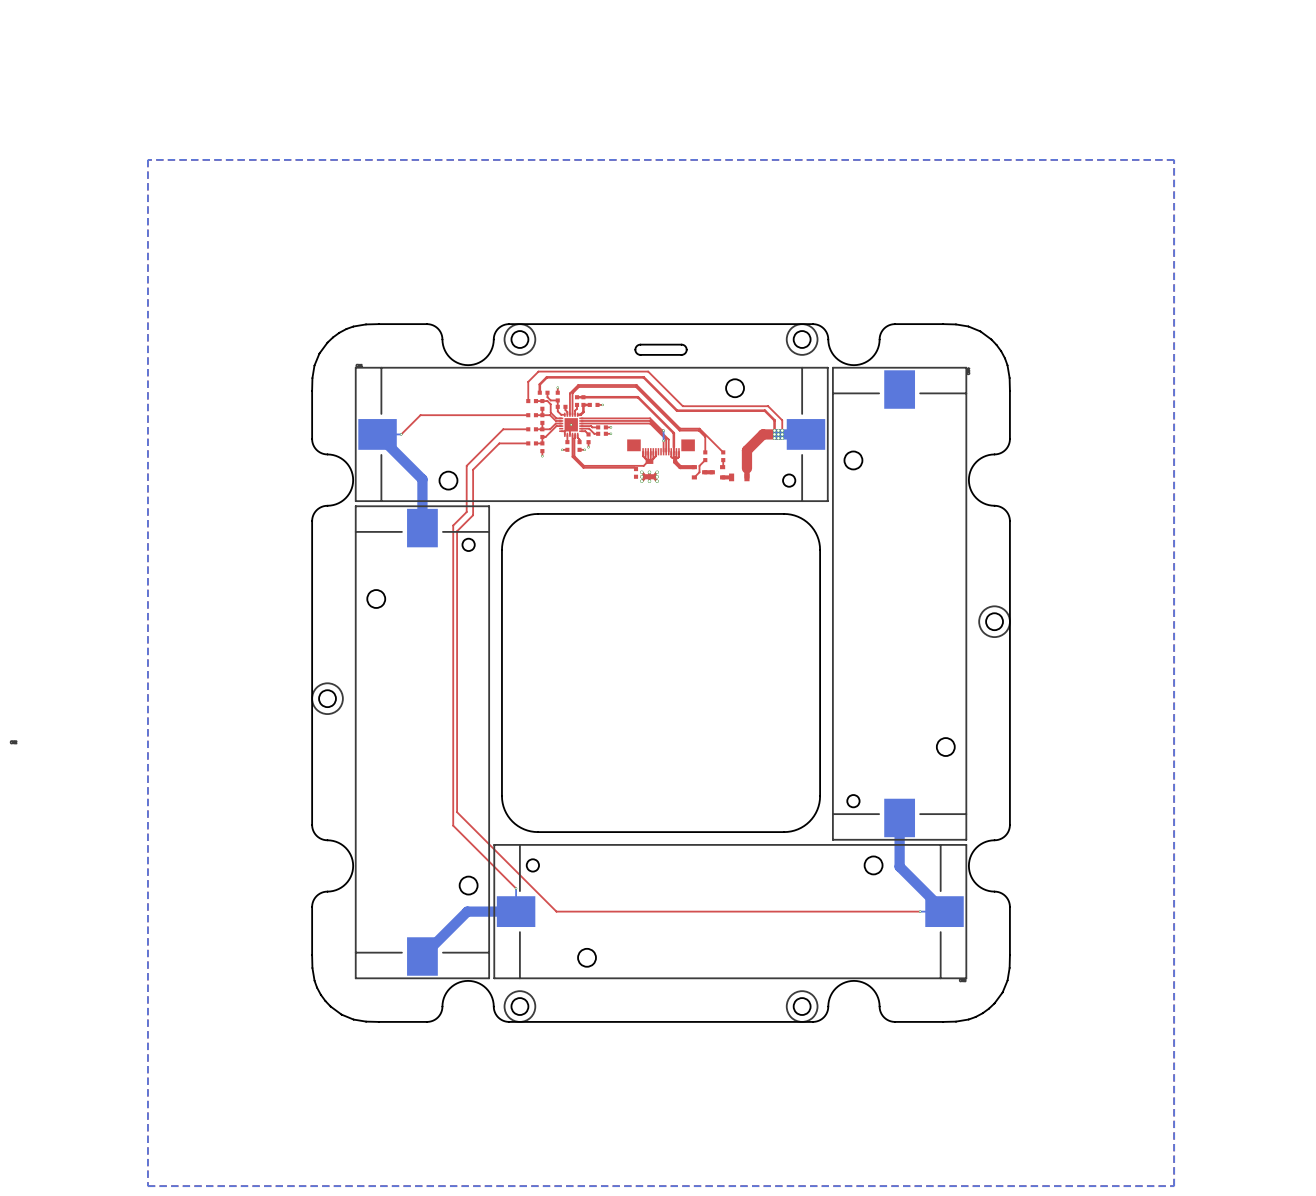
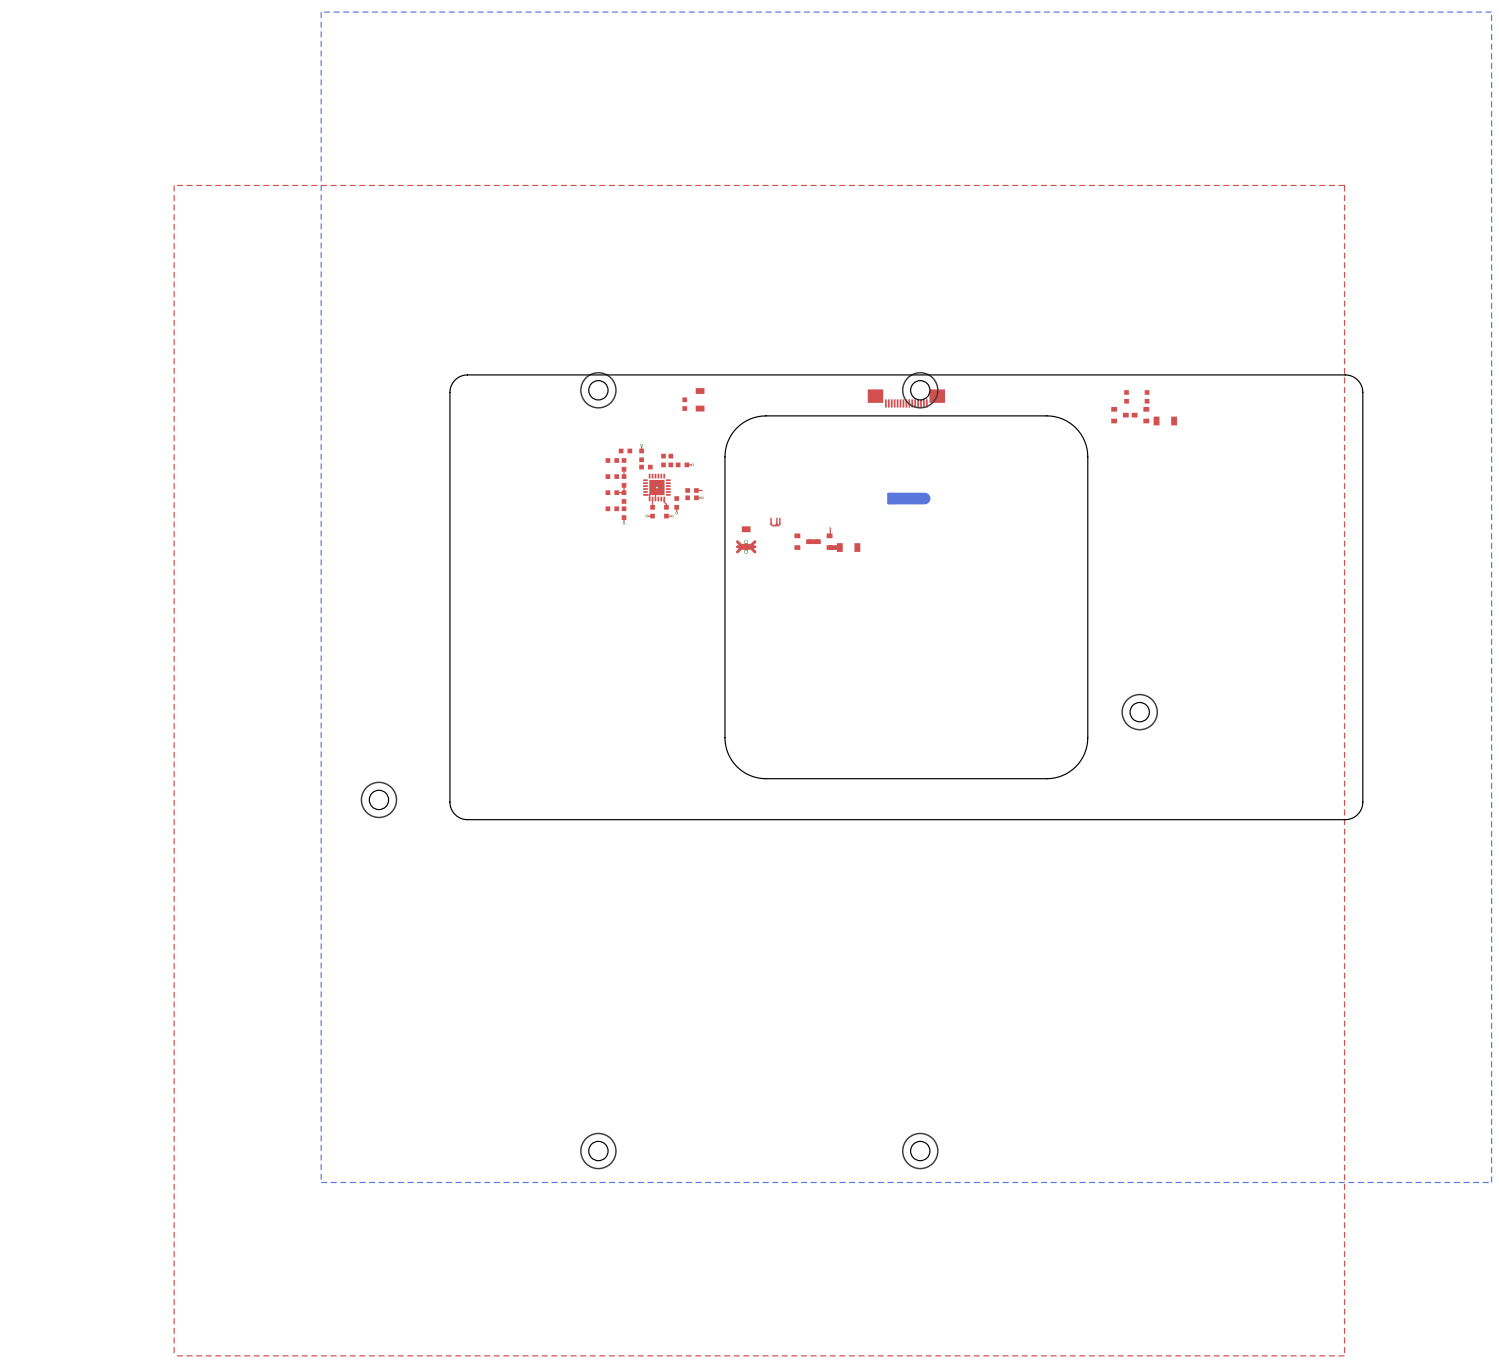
bottom zone outline: (1174, 159) (147, 159) (147, 1186) (1174, 1186) (1174, 159) -> (1491, 12) (321, 12) (321, 1182) (1491, 1182) (1491, 12)
board edge: (943, 324) (889, 325) (881, 331) (878, 347) (874, 355) (865, 362) (853, 365) (845, 363) (835, 357) (829, 347) (825, 330) (820, 326) (812, 324) (507, 324) (499, 327) (495, 331) (492, 347) (486, 357) (476, 363) (468, 365) (459, 363) (449, 357) (443, 347) (440, 331) (436, 327) (429, 324) (366, 324) (353, 326) (339, 332) (327, 342) (319, 353) (312, 378) (312, 441) (315, 448) (319, 452) (335, 455) (345, 461) (351, 471) (353, 480) (351, 488) (345, 498) (335, 504) (318, 508) (314, 513) (312, 521) (312, 826) (315, 834) (319, 838) (335, 841) (345, 847) (351, 857) (353, 865) (351, 874) (345, 884) (335, 890) (319, 893) (315, 897) (312, 904) (312, 968) (314, 980) (320, 994) (330, 1006) (341, 1014) (366, 1021) (429, 1021) (436, 1018) (440, 1014) (443, 998) (449, 988) (459, 982) (468, 980) (476, 982) (486, 988) (492, 998) (496, 1015) (501, 1019) (509, 1021) (814, 1021) (822, 1018) (826, 1014) (829, 998) (835, 988) (845, 982) (853, 980) (862, 982) (872, 988) (878, 998) (881, 1014) (885, 1018) (892, 1021) (956, 1021) (968, 1019) (982, 1013) (994, 1003) (1002, 992) (1009, 967) (1009, 904) (1006, 897) (1002, 893) (986, 890) (976, 884) (970, 874) (968, 865) (970, 857) (976, 847) (986, 841) (1002, 838) (1006, 834) (1009, 826) (1009, 521) (1007, 513) (1003, 508) (986, 504) (976, 498) (970, 488) (968, 480) (971, 468) (978, 460) (986, 455) (1002, 452) (1008, 444) (1009, 378) (1005, 358) (991, 339) (980, 331) (968, 326) (943, 324) -> none
board edge: none -> (1345, 374) (460, 376) (453, 381) (449, 392) (451, 808) (456, 816) (467, 819) (1351, 818) (1359, 812) (1362, 802) (1362, 392) (1357, 380) (1345, 374)
board edge: (681, 344) (639, 344) (636, 346) (635, 350) (639, 354) (682, 354) (686, 349) (685, 346) (681, 344) -> none
part: none -> (1126, 396)
part: none -> (1147, 396)
part: none -> (906, 398)
part: none -> (700, 399)
part: none -> (684, 404)
board edge: none -> (1046, 415) (765, 415) (750, 419) (734, 430) (728, 441) (724, 456) (724, 737) (728, 753) (739, 769) (750, 775) (765, 778) (1046, 778) (1062, 775) (1078, 763) (1084, 753) (1087, 737) (1087, 452) (1082, 437) (1072, 425) (1062, 419) (1046, 415)
part: none -> (1119, 415)
part: none -> (1140, 415)
part: none -> (1165, 421)
top track: (539, 392) (539, 384) (546, 377) (643, 377) (677, 410) (764, 410) (774, 420) (774, 430) -> none
top track: (547, 392) (547, 397) (550, 400) (557, 400) (557, 411) (561, 414) (564, 414) -> none
top track: (577, 397) (637, 397) (673, 433) (675, 462) (680, 467) (694, 467) -> none
top track: (528, 401) (528, 381) (538, 371) (648, 371) (682, 406) (768, 406) (782, 420) (782, 430) -> none
top track: (535, 401) (547, 401) (550, 404) (550, 412) (556, 418) (561, 418) -> none
top track: (577, 404) (575, 414) -> none
top track: (589, 404) (583, 404) (583, 411) (577, 414) -> none
top track: (565, 406) (567, 414) -> none
top track: (569, 414) (569, 393) (578, 385) (636, 385) (680, 428) (699, 428) (723, 452) -> none
top track: (572, 414) (572, 393) (578, 386) (636, 386) (679, 430) (698, 430) (705, 436) (705, 452) -> none
top track: (528, 415) (420, 415) (401, 434) -> none
top track: (535, 415) (550, 415) (555, 420) (561, 420) -> none
top track: (581, 418) (650, 418) (663, 430) -> none
top track: (581, 420) (650, 420) (668, 439) (668, 451) -> none
top track: (561, 423) (555, 423) (550, 429) (542, 429) -> none
top track: (581, 423) (650, 423) (666, 439) (666, 451) -> none
top track: (561, 426) (556, 426) (545, 436) (542, 436) (542, 443) (535, 443) -> none
top track: (581, 426) (598, 427) -> none
via: (611, 427) -> none
top track: (581, 428) (589, 428) (594, 433) (598, 433) -> none
top track: (528, 429) (503, 429) (466, 465) (466, 512) (453, 525) (453, 825) (516, 888) -> none
bottom track: (663, 430) (663, 440) -> none
via: (663, 430) -> none
via: (774, 430) -> none
via: (778, 430) -> none
via: (782, 430) -> none
top track: (581, 431) (585, 431) (588, 434) -> none
bottom track: (401, 434) (377, 434) (422, 479) (422, 528) -> none
via: (401, 434) -> none
top track: (572, 434) (572, 456) (583, 467) (636, 469) -> none
top track: (575, 434) (574, 456) (584, 465) (643, 465) (648, 461) -> none
part: (591, 434) -> none
via: (774, 434) -> none
top track: (778, 434) (763, 434) (746, 450) (746, 477) -> none
via: (778, 434) -> none
via: (782, 434) -> none
via: (774, 438) -> none
via: (778, 438) -> none
via: (782, 438) -> none
top track: (663, 440) (663, 451) -> none
via: (663, 440) -> none
top track: (528, 443) (499, 443) (473, 469) (473, 515) (457, 531) (457, 812) (556, 911) (920, 911) -> none
part: (661, 447) -> none
top track: (643, 451) (643, 456) (648, 461) -> none
top track: (645, 451) (645, 458) -> none
top track: (650, 451) (649, 461) (648, 451) -> none
top track: (653, 451) (653, 458) -> none
top track: (655, 451) (655, 456) (648, 461) -> none
part: (705, 456) -> none
part: (723, 456) -> none
top track: (705, 460) (699, 465) (699, 472) (694, 477) -> none
part: (636, 472) -> none
via: (641, 472) -> none
via: (657, 472) -> none
via: (641, 476) -> none
via: (657, 476) -> none
via: (641, 481) -> none
via: (657, 481) -> none
board edge: (784, 513) (537, 513) (524, 516) (510, 527) (504, 536) (501, 549) (501, 796) (504, 809) (515, 823) (524, 829) (537, 832) (784, 832) (797, 829) (811, 818) (817, 809) (820, 796) (819, 546) (815, 532) (806, 522) (797, 516) (784, 513) -> none
part: (899, 603) -> none
part: (422, 742) -> none
bottom track: (899, 817) (899, 866) (944, 911) (920, 911) -> none
bottom track: (516, 888) (516, 911) (467, 911) (422, 956) -> none
via: (516, 888) -> none
part: (730, 911) -> none
via: (920, 911) -> none

